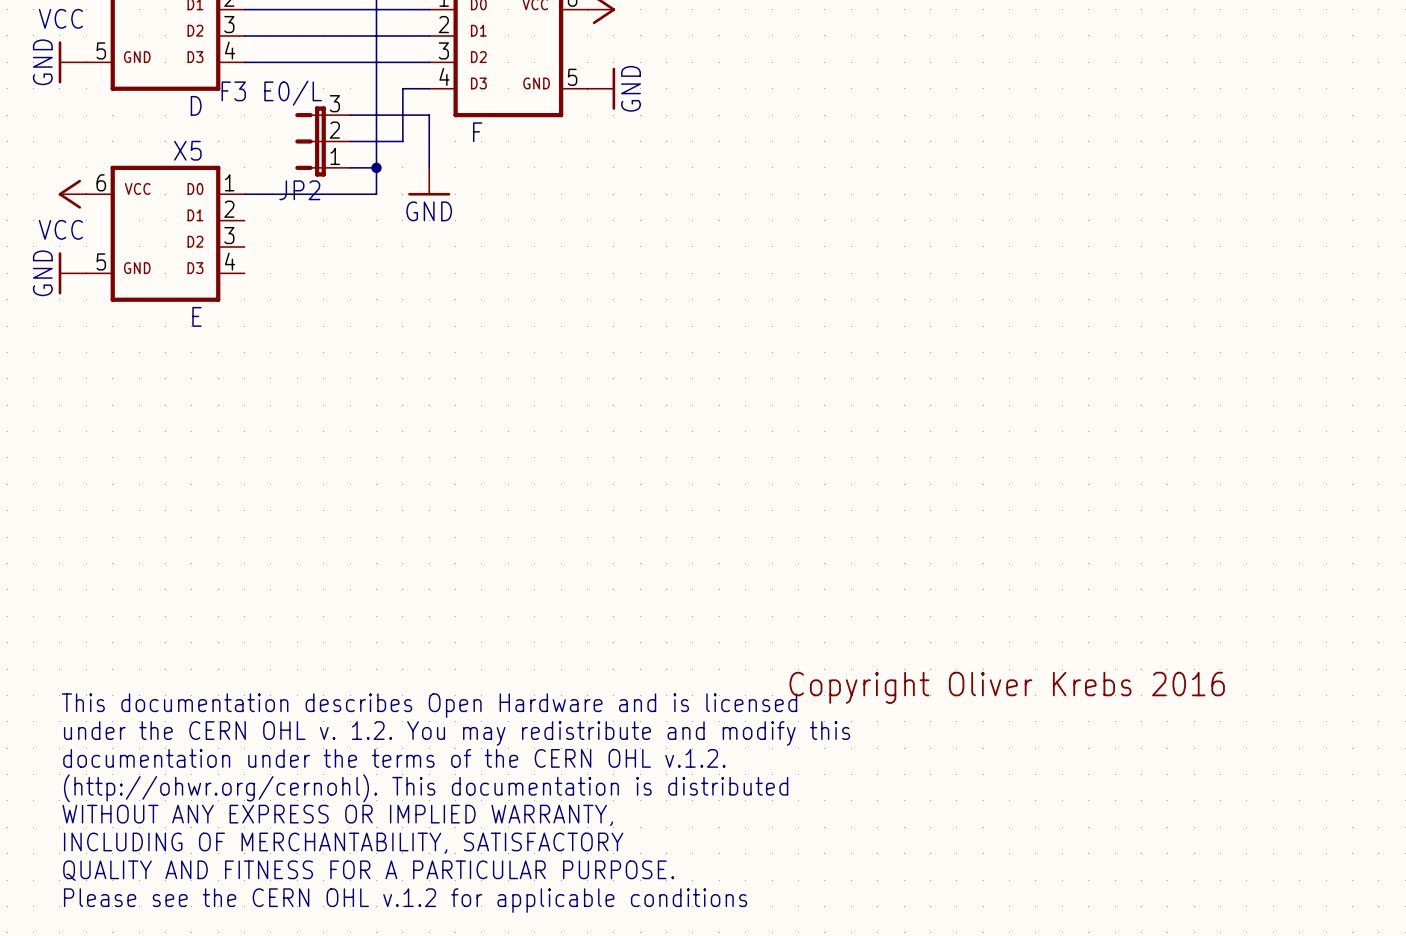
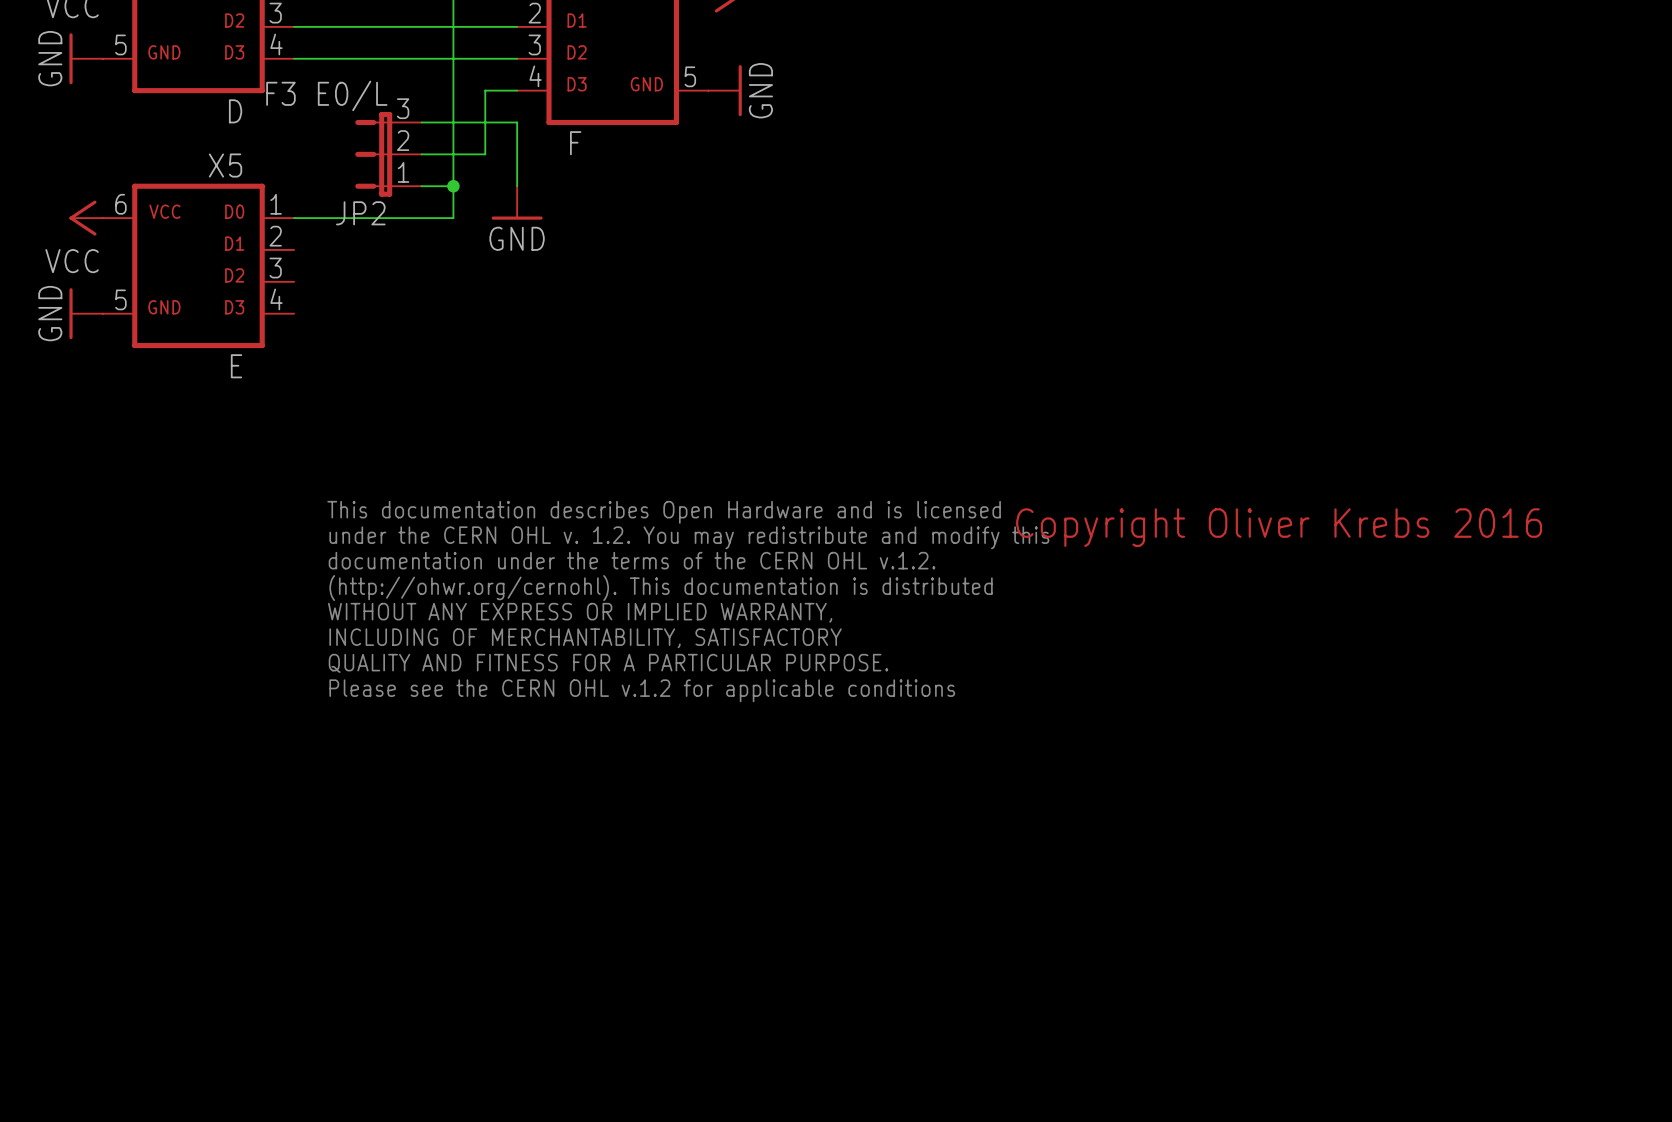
text: none -> This documentation describes Open Hardware and is licensed (664, 512)
text: none -> under the CERN OHL v. 1.2. You may redistribute and modify this (689, 537)
text: none -> documentation under the terms of the CERN OHL v.1.2. (632, 560)
text: none -> (http://ohwr.org/cernohl). This documentation is distributed (661, 588)
text: none -> WITHOUT ANY EXPRESS OR IMPLIED WARRANTY, (580, 612)
text: none -> INCLUDING OF MERCHANTABILITY, SATISFACTORY (585, 638)
text: none -> QUALITY AND FITNESS FOR A PARTICULAR PURPOSE. (608, 663)
text: none -> Please see the CERN OHL v.1.2 for applicable conditions (642, 690)
text position: Copyright Oliver Krebs 2016 (1007, 687) -> Copyright Oliver Krebs 2016 (1279, 527)
text: This documentation describes Open Hardware and is licensed (429, 705) -> none
text: under the CERN OHL v. 1.2. You may redistribute and modify this (457, 733) -> none
text: documentation under the terms of the CERN OHL v.1.2. (394, 758) -> none
text: (http://ohwr.org/cernohl). This documentation is distributed (426, 788) -> none
text: WITHOUT ANY EXPRESS OR IMPLIED WARRANTY, (337, 815) -> none
text: INCLUDING OF MERCHANTABILITY, SATISFACTORY (343, 843) -> none
text: QUALITY AND FITNESS FOR A PARTICULAR PURPOSE. (368, 870) -> none
text: Please see the CERN OHL v.1.2 for applicable conditions (405, 900) -> none

